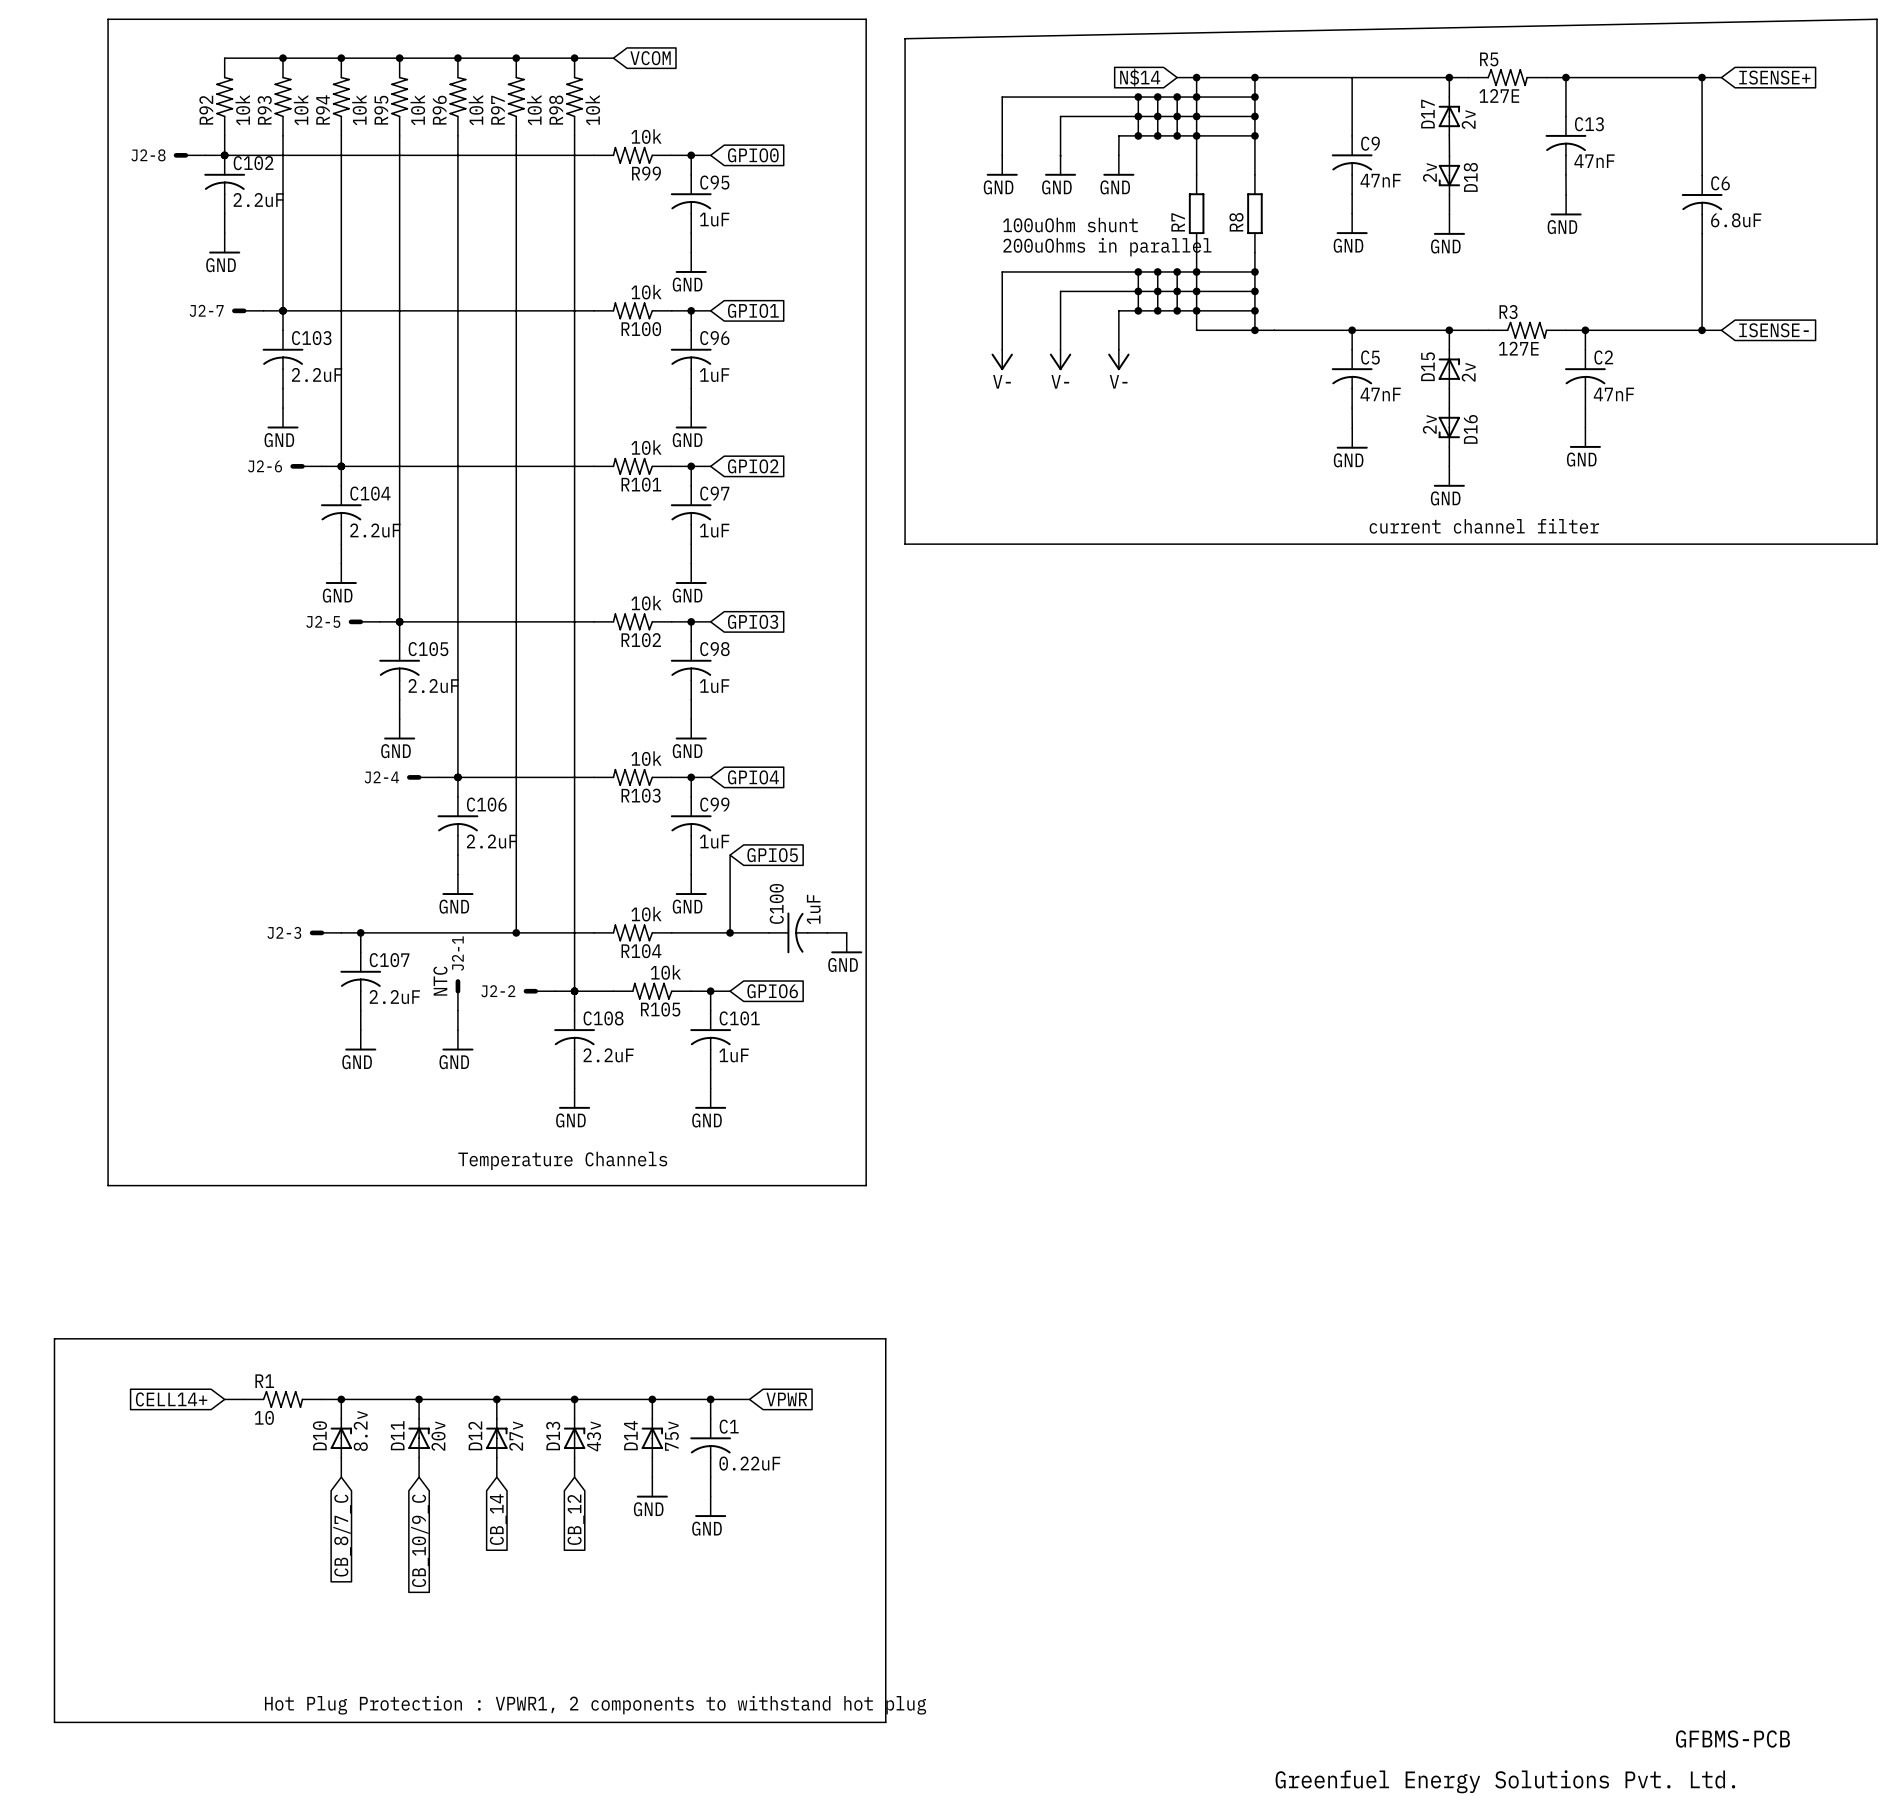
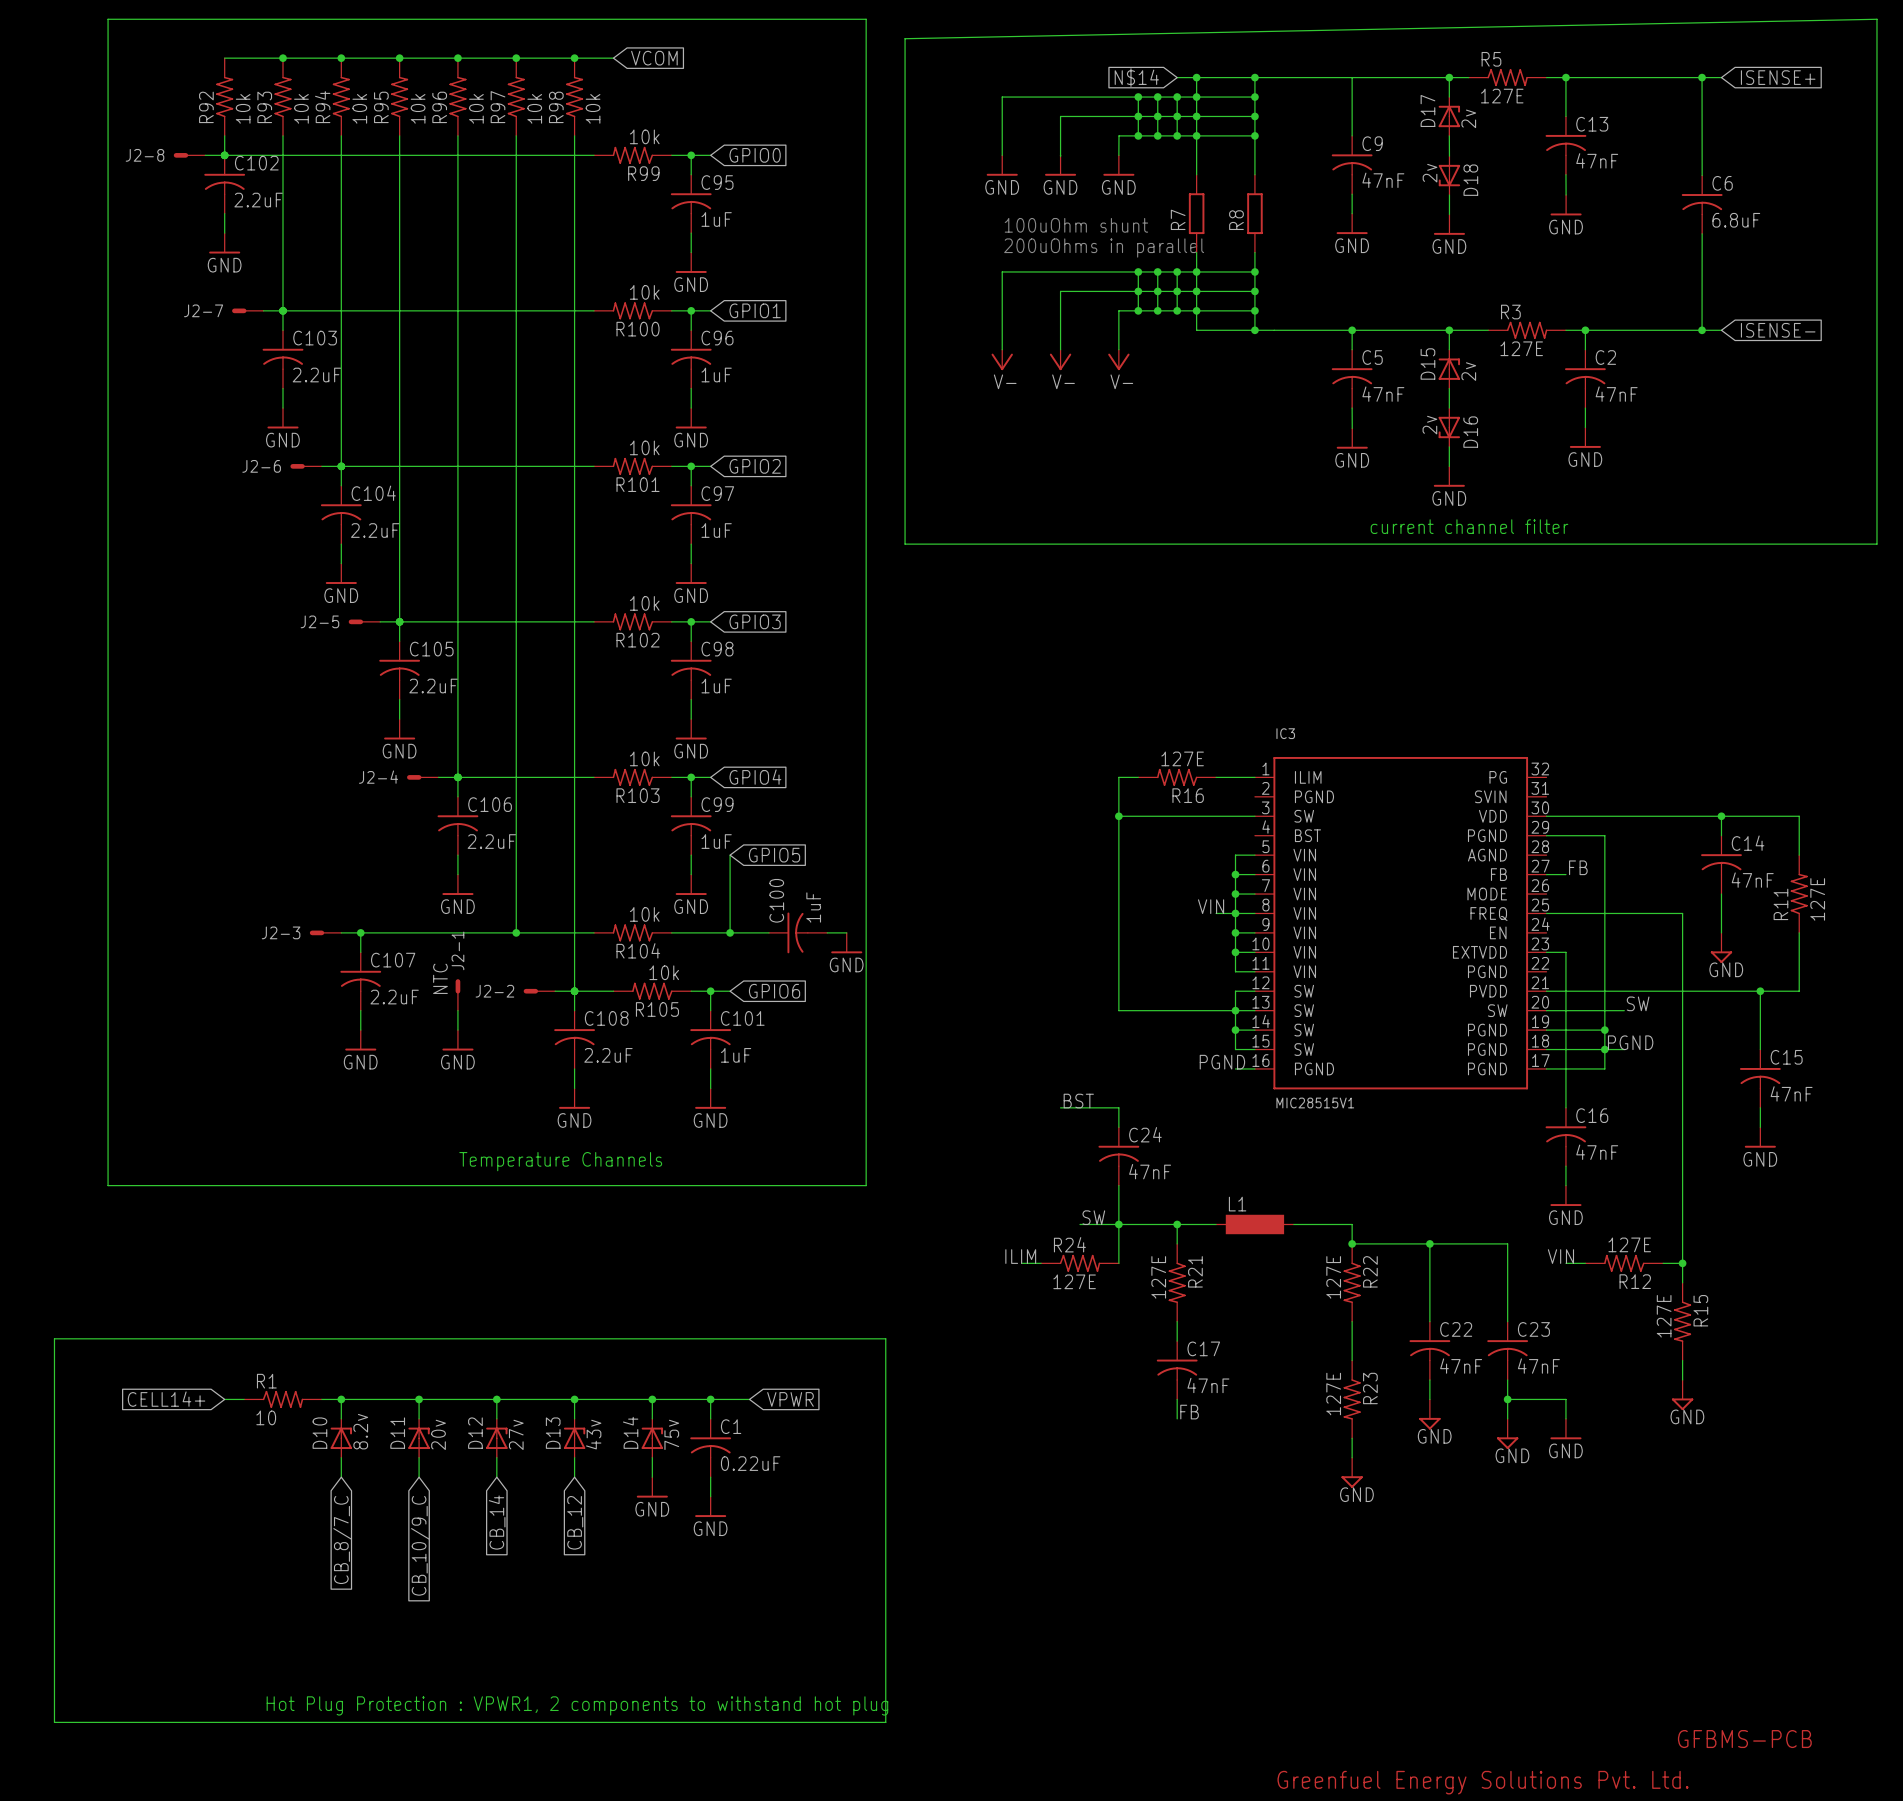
wire: none -> (1138, 777) (1118, 777) (1118, 1010) (1254, 1010)
R16: none -> 127E (1177, 777)
wire: none -> (1216, 777) (1254, 777)
wire: none -> (1118, 816) (1254, 816)
junction: none -> (1118, 816)
wire: none -> (1546, 816) (1799, 816) (1799, 855)
wire: none -> (1721, 816) (1721, 835)
junction: none -> (1721, 816)
wire: none -> (1546, 835) (1604, 835) (1604, 1068) (1546, 1068)
wire: none -> (1254, 855) (1235, 855) (1235, 971) (1254, 971)
C14: none -> 47nF (1721, 864)
label: none -> FB (1578, 867)
wire: none -> (1235, 874) (1254, 874)
junction: none -> (1235, 874)
wire: none -> (1546, 874) (1565, 874)
wire: none -> (1235, 894) (1254, 894)
junction: none -> (1235, 894)
wire: none -> (1721, 894) (1721, 932)
R11: none -> 127E (1799, 894)
label: none -> VIN (1211, 906)
wire: none -> (1216, 913) (1254, 913)
junction: none -> (1235, 913)
wire: none -> (1546, 913) (1682, 913) (1682, 1282)
IC3: none -> MIC28515V1 (1400, 923)
wire: none -> (1235, 932) (1254, 932)
junction: none -> (1235, 932)
wire: none -> (1799, 932) (1799, 991) (1546, 991)
power symbol: none -> GND (1721, 947)
wire: none -> (1235, 952) (1254, 952)
junction: none -> (1235, 952)
wire: none -> (1546, 952) (1565, 952) (1565, 1107)
wire: none -> (1254, 991) (1235, 991) (1235, 1049) (1254, 1049)
wire: none -> (1760, 991) (1760, 1049)
junction: none -> (1760, 991)
label: none -> SW (1638, 1003)
junction: none -> (1235, 1010)
wire: none -> (1546, 1010) (1624, 1010)
wire: none -> (1235, 1030) (1254, 1030)
junction: none -> (1235, 1030)
wire: none -> (1546, 1030) (1604, 1030)
junction: none -> (1604, 1030)
label: none -> PGND (1630, 1042)
wire: none -> (1546, 1049) (1624, 1049)
junction: none -> (1604, 1049)
label: none -> PGND (1222, 1062)
wire: none -> (1235, 1068) (1254, 1068)
C15: none -> 47nF (1760, 1078)
label: none -> BST (1078, 1101)
wire: none -> (1060, 1107) (1118, 1107) (1118, 1127)
wire: none -> (1760, 1107) (1760, 1127)
C16: none -> 47nF (1565, 1137)
power symbol: none -> GND (1760, 1137)
C24: none -> 47nF (1118, 1156)
wire: none -> (1565, 1166) (1565, 1185)
wire: none -> (1118, 1185) (1118, 1263)
power symbol: none -> GND (1565, 1195)
label: none -> SW (1093, 1217)
wire: none -> (1079, 1224) (1216, 1224)
junction: none -> (1118, 1224)
wire: none -> (1177, 1224) (1177, 1243)
junction: none -> (1177, 1224)
L1: none -> (1254, 1224)
wire: none -> (1293, 1224) (1352, 1224) (1352, 1243) (1507, 1243) (1507, 1321)
junction: none -> (1352, 1243)
wire: none -> (1429, 1243) (1429, 1321)
junction: none -> (1429, 1243)
label: none -> ILIM (1020, 1256)
label: none -> VIN (1560, 1256)
wire: none -> (1021, 1263) (1041, 1263)
R24: none -> 127E (1079, 1263)
wire: none -> (1565, 1263) (1585, 1263)
R12: none -> 127E (1624, 1263)
wire: none -> (1663, 1263) (1682, 1263)
junction: none -> (1682, 1263)
R21: none -> 127E (1177, 1282)
R22: none -> 127E (1352, 1282)
wire: none -> (1177, 1321) (1177, 1341)
wire: none -> (1352, 1321) (1352, 1360)
R15: none -> 127E (1682, 1321)
C22: none -> 47nF (1429, 1350)
C23: none -> 47nF (1507, 1350)
wire: none -> (1682, 1360) (1682, 1379)
C17: none -> 47nF (1177, 1370)
wire: none -> (1429, 1379) (1429, 1399)
wire: none -> (1507, 1379) (1507, 1418)
power symbol: none -> GND (1682, 1395)
wire: none -> (1177, 1399) (1177, 1418)
R23: none -> 127E (1352, 1399)
wire: none -> (1507, 1399) (1565, 1399) (1565, 1418)
junction: none -> (1507, 1399)
label: none -> FB (1189, 1412)
power symbol: none -> GND (1429, 1414)
power symbol: none -> GND (1565, 1429)
power symbol: none -> GND (1507, 1433)
wire: none -> (1352, 1438) (1352, 1457)
power symbol: none -> GND (1352, 1472)

